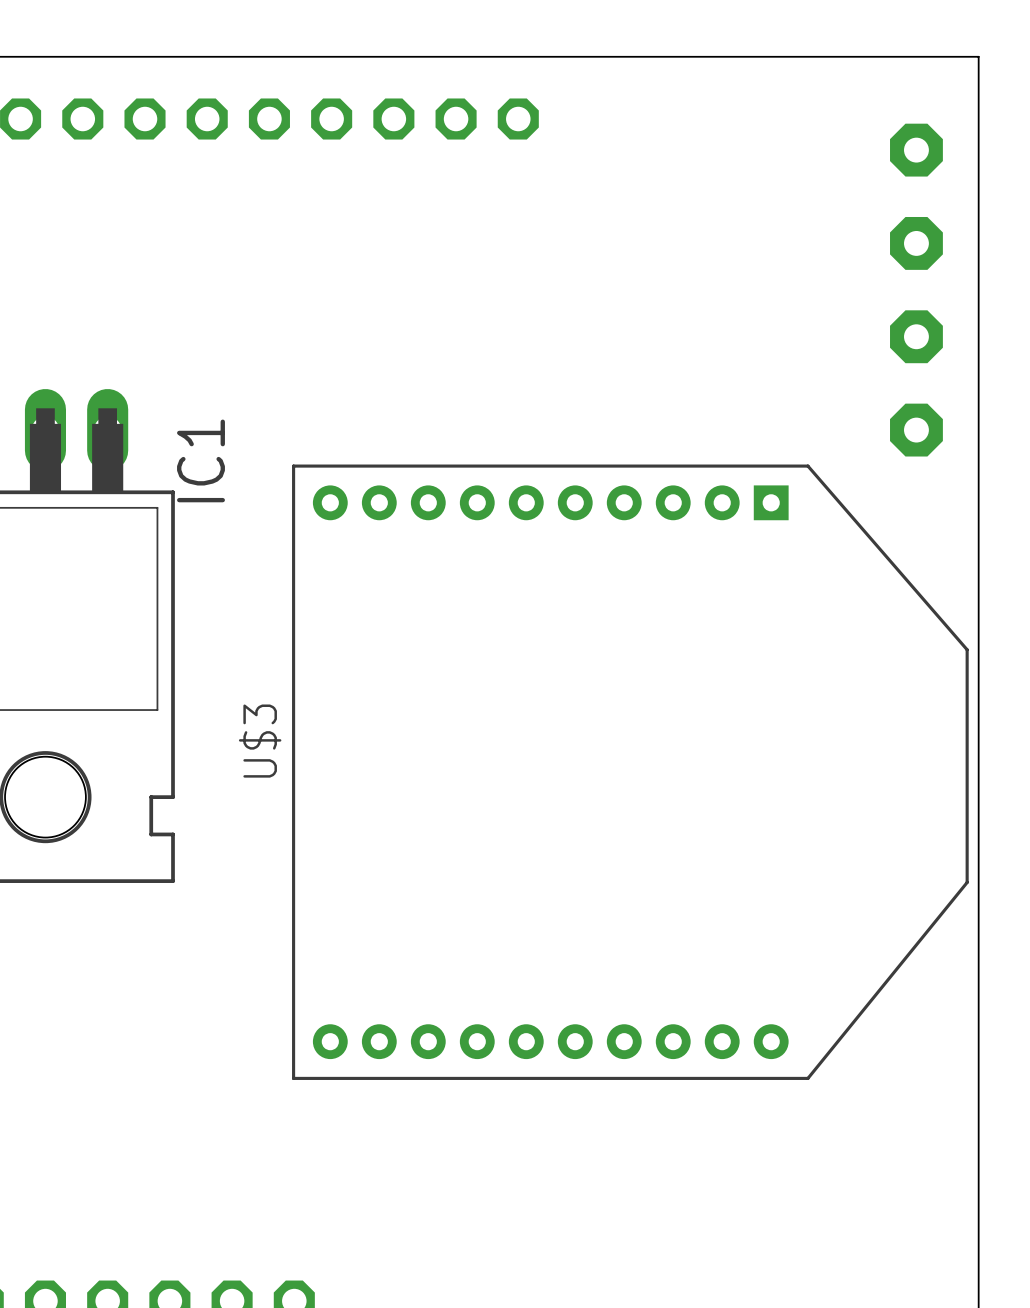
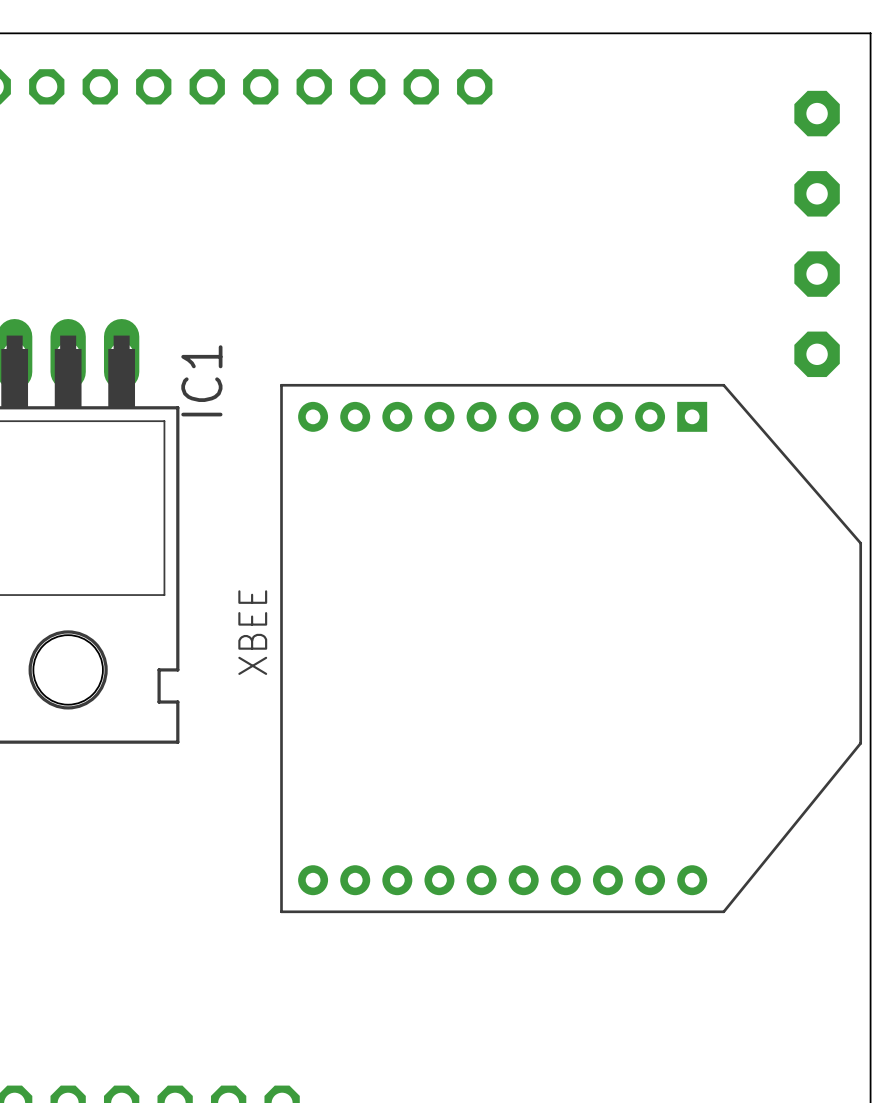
U$3 name: U$3 (260, 741) -> XBEE (252, 632)

